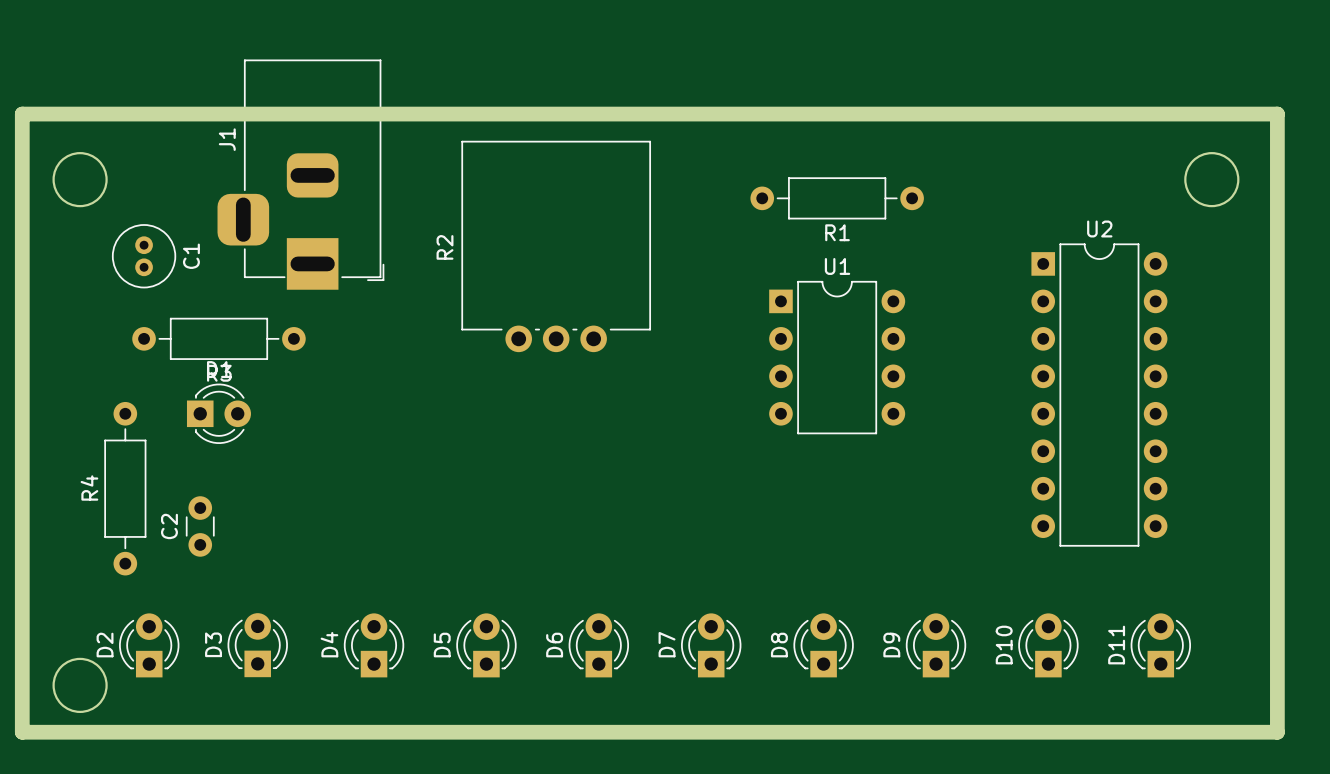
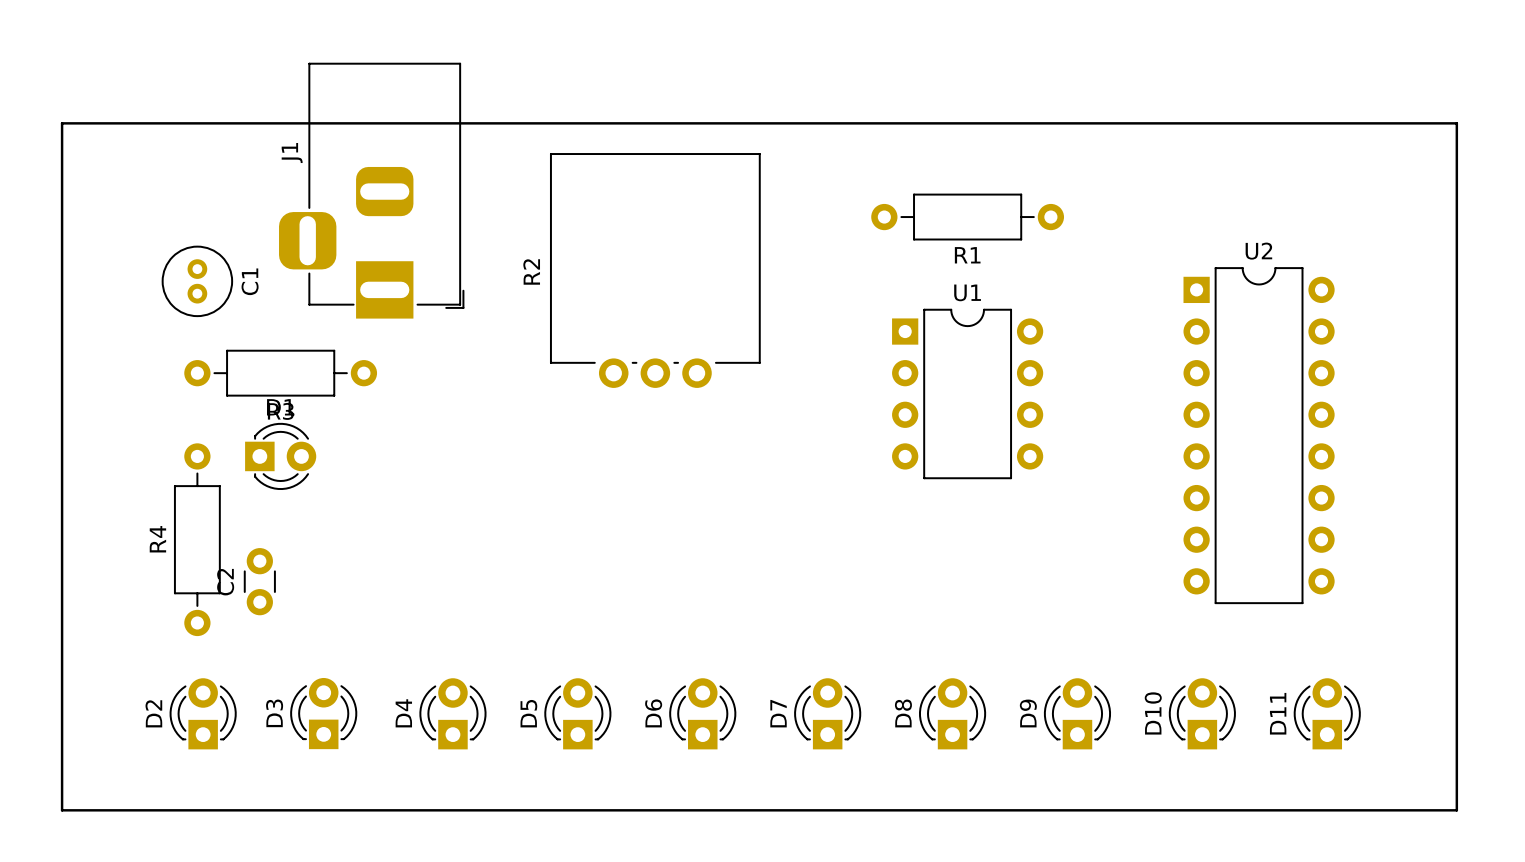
board edge width: thick (22, 114) (22, 732) (1277, 732) (1277, 114) (22, 114) -> thin (62, 123) (62, 810) (1456, 810) (1456, 123) (62, 123)
round board edge: [52, 152, 108, 208] -> none
round board edge: [1184, 152, 1240, 208] -> none
R4 position: (125, 488) -> (197, 539)
round board edge: [52, 657, 108, 714] -> none

